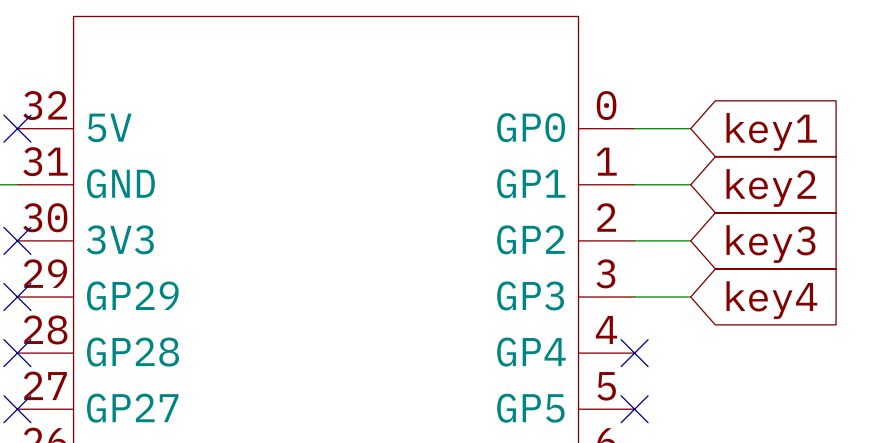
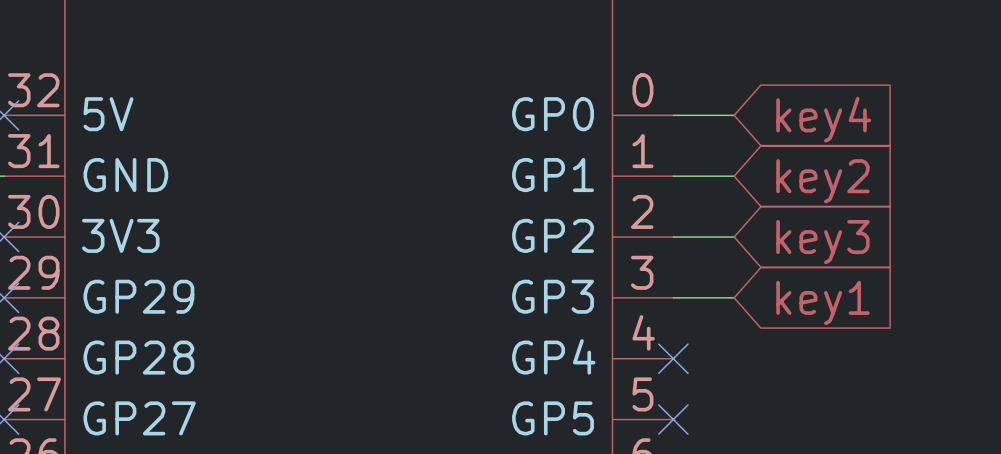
global label: key1 (771, 131) -> key4 (823, 119)
global label: key4 (771, 300) -> key1 (822, 302)

